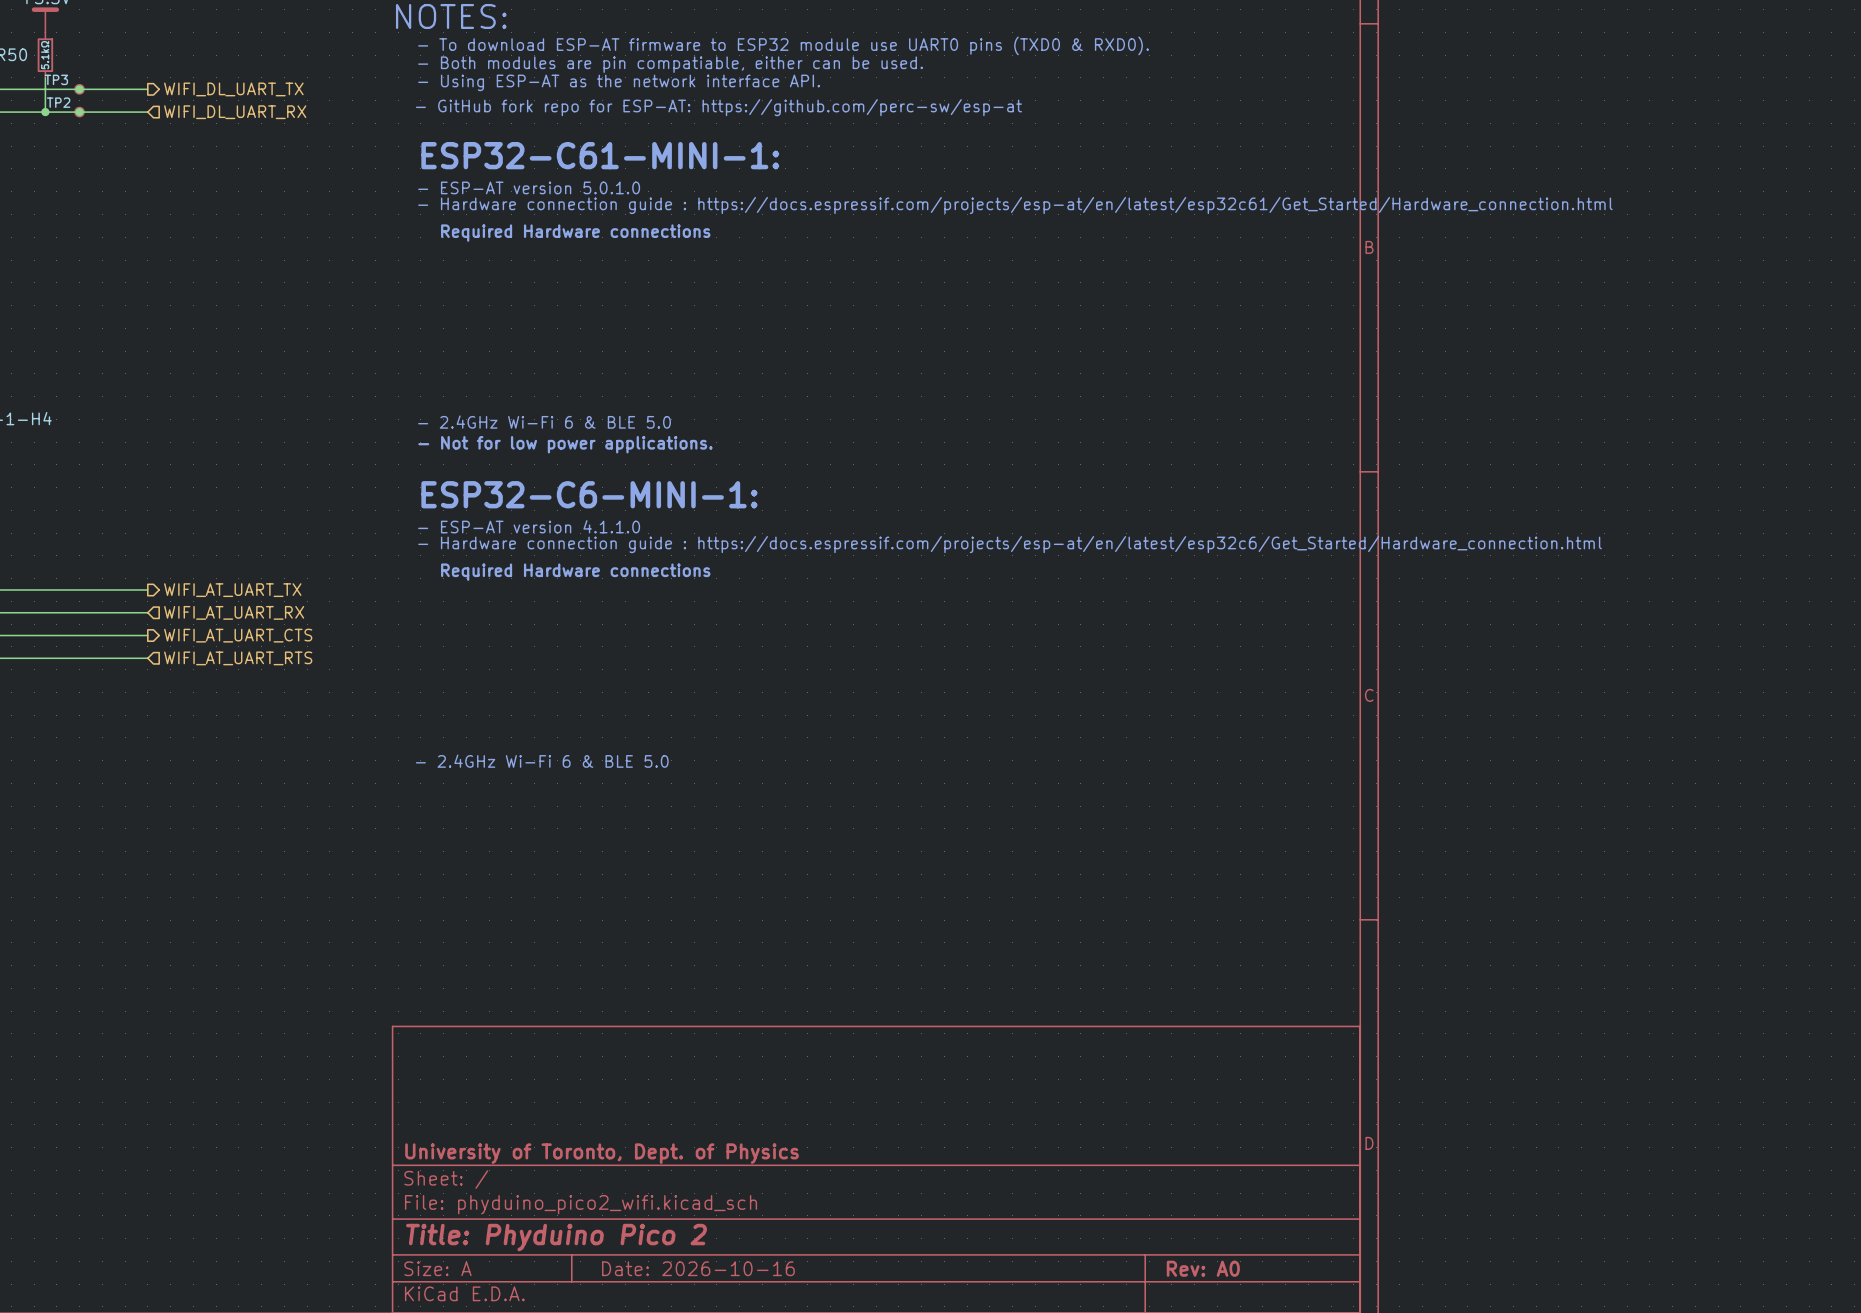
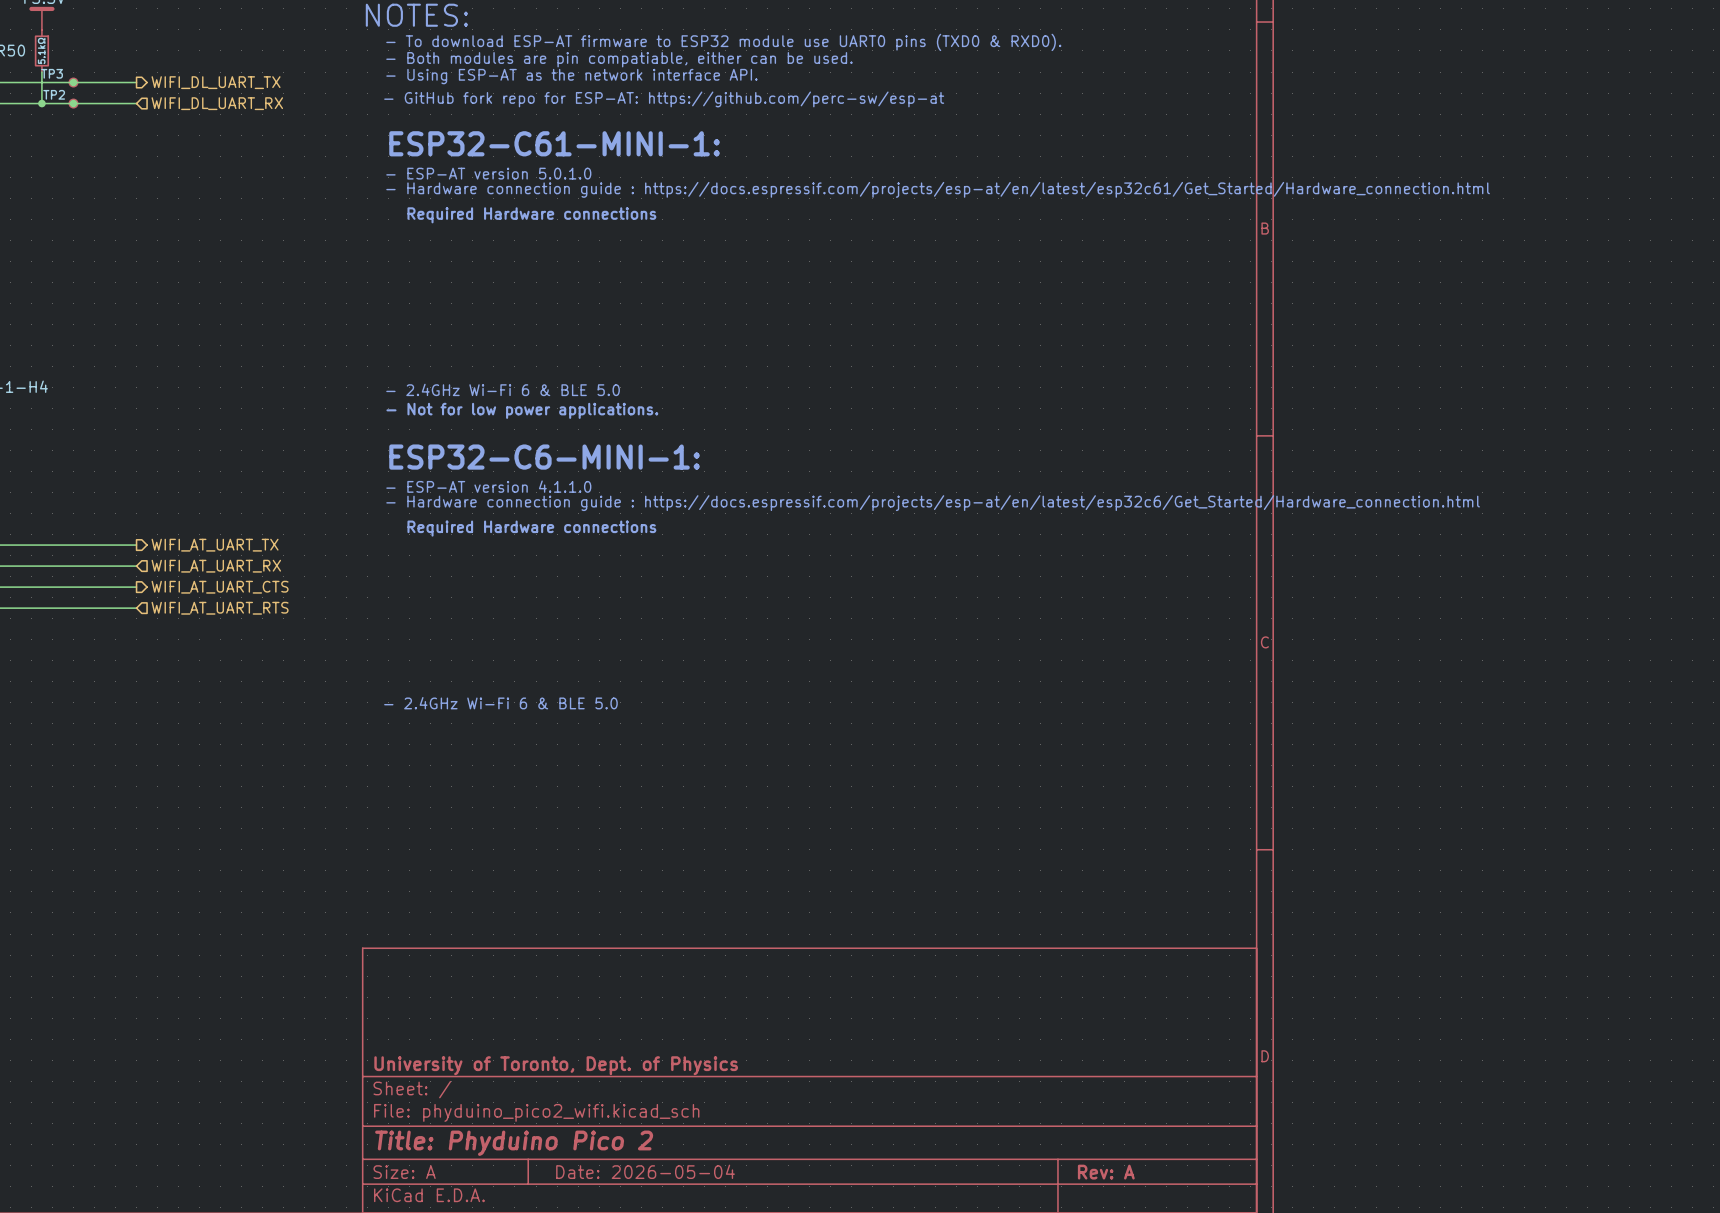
title block: Date: 2026-10-16 (698, 1268) -> Date: 2026-05-04 (645, 1171)
title block: Rev: A0 (1203, 1268) -> Rev: A (1106, 1172)

